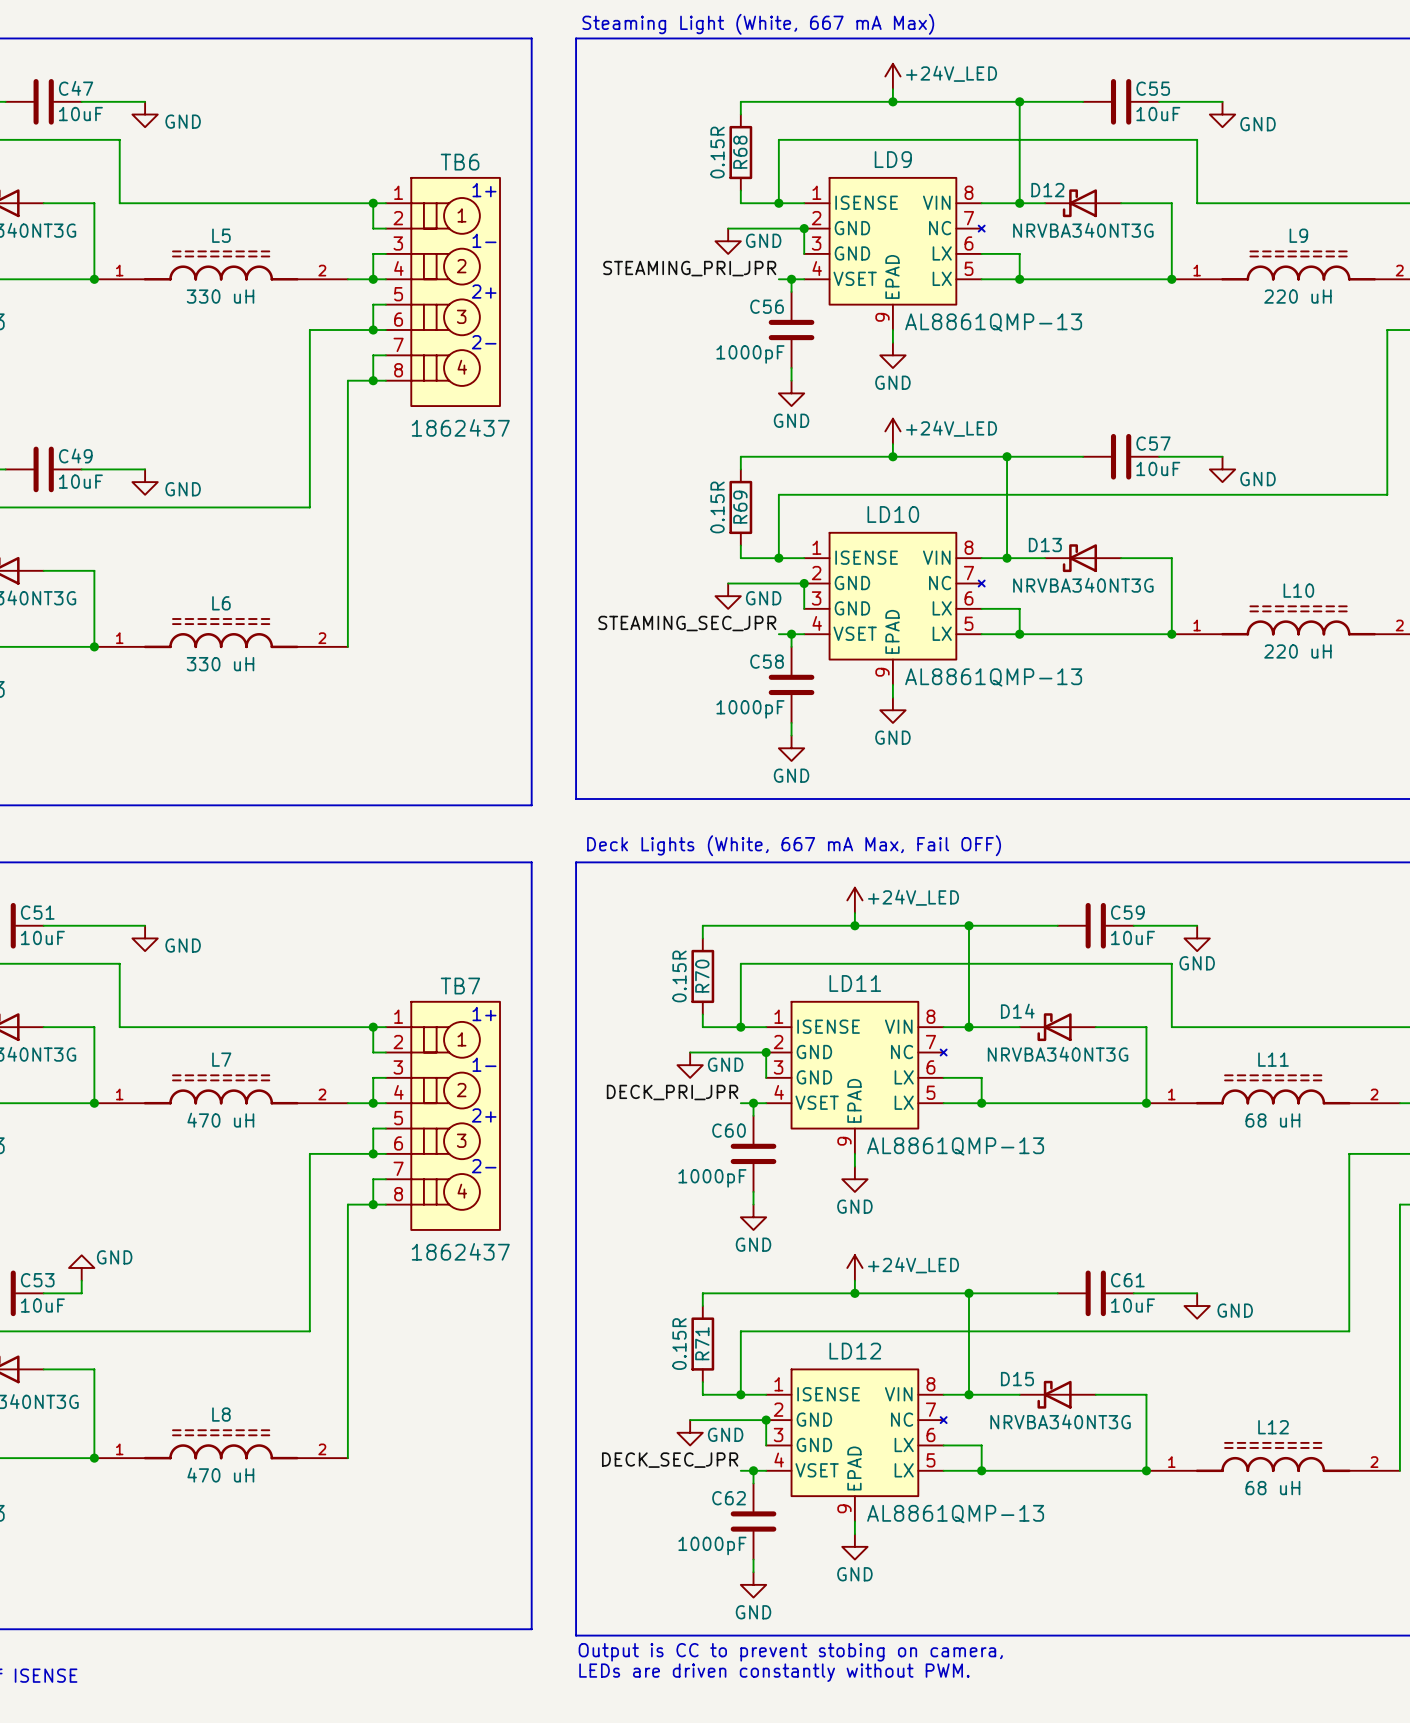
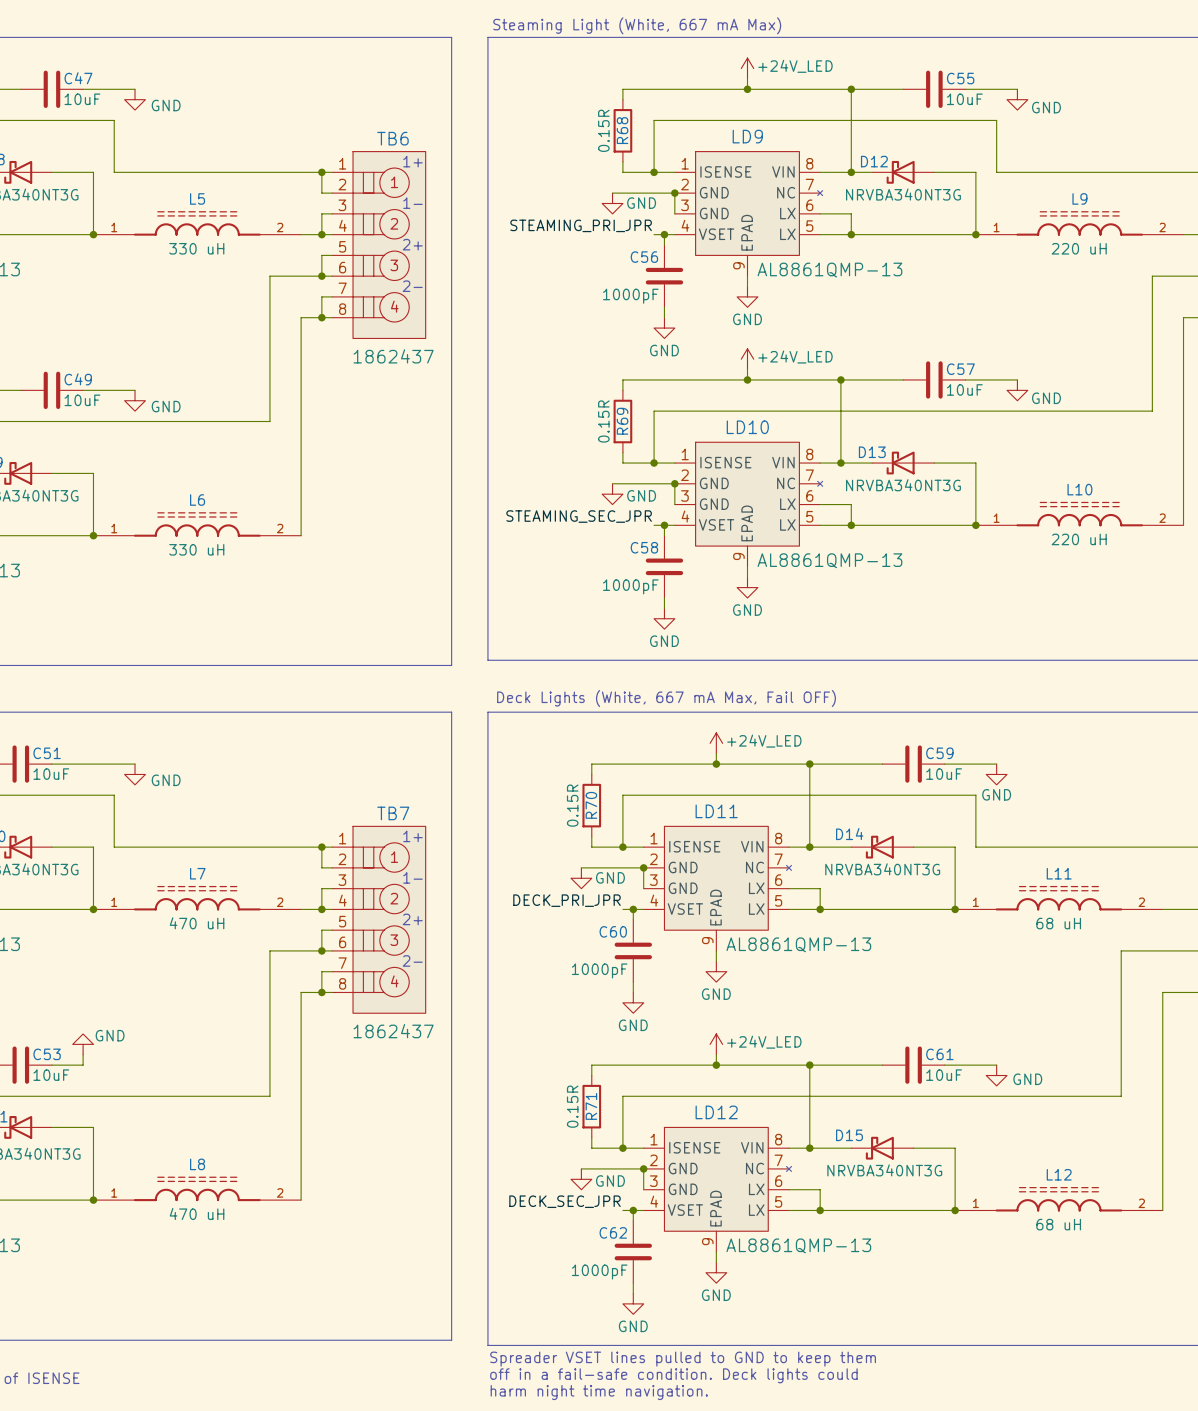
text: Output is CC to prevent stobing on camera, (790, 1652) -> Spreader VSET lines pulled to GND to keep them (683, 1359)
text: LEDs are driven constantly without PWM. (774, 1672) -> off in a fail-safe condition. Deck lights could (673, 1375)
text: none -> harm night time navigation. (599, 1392)

